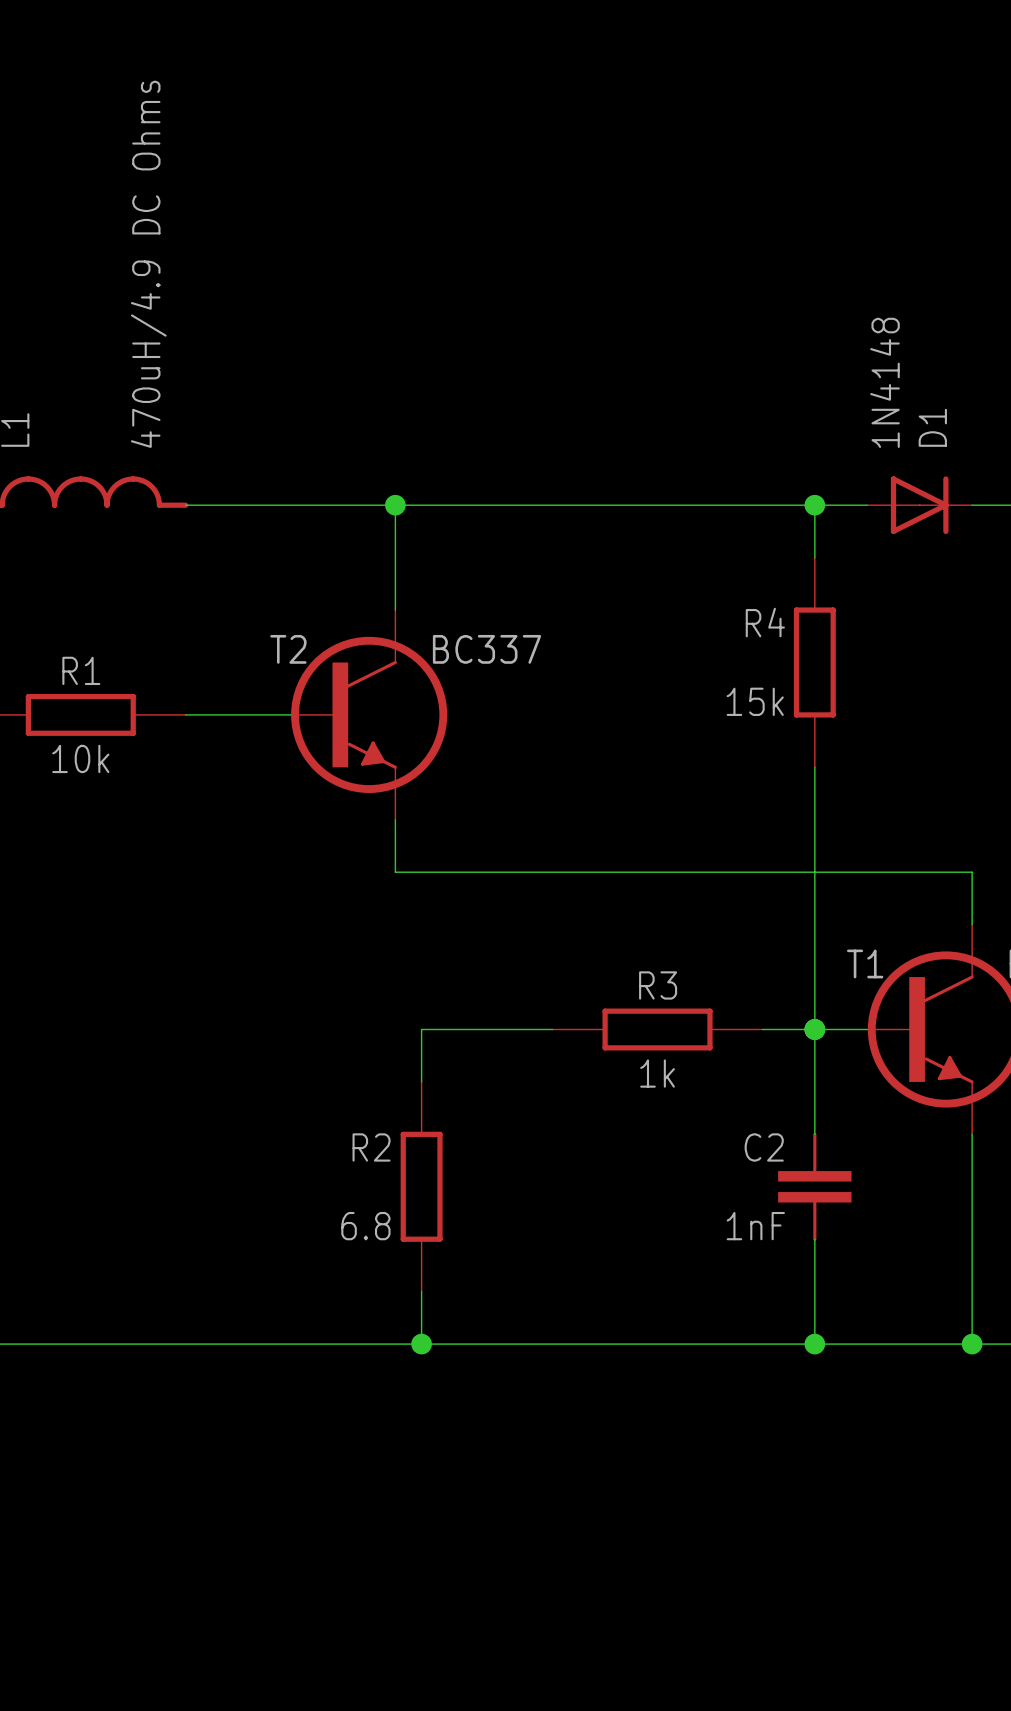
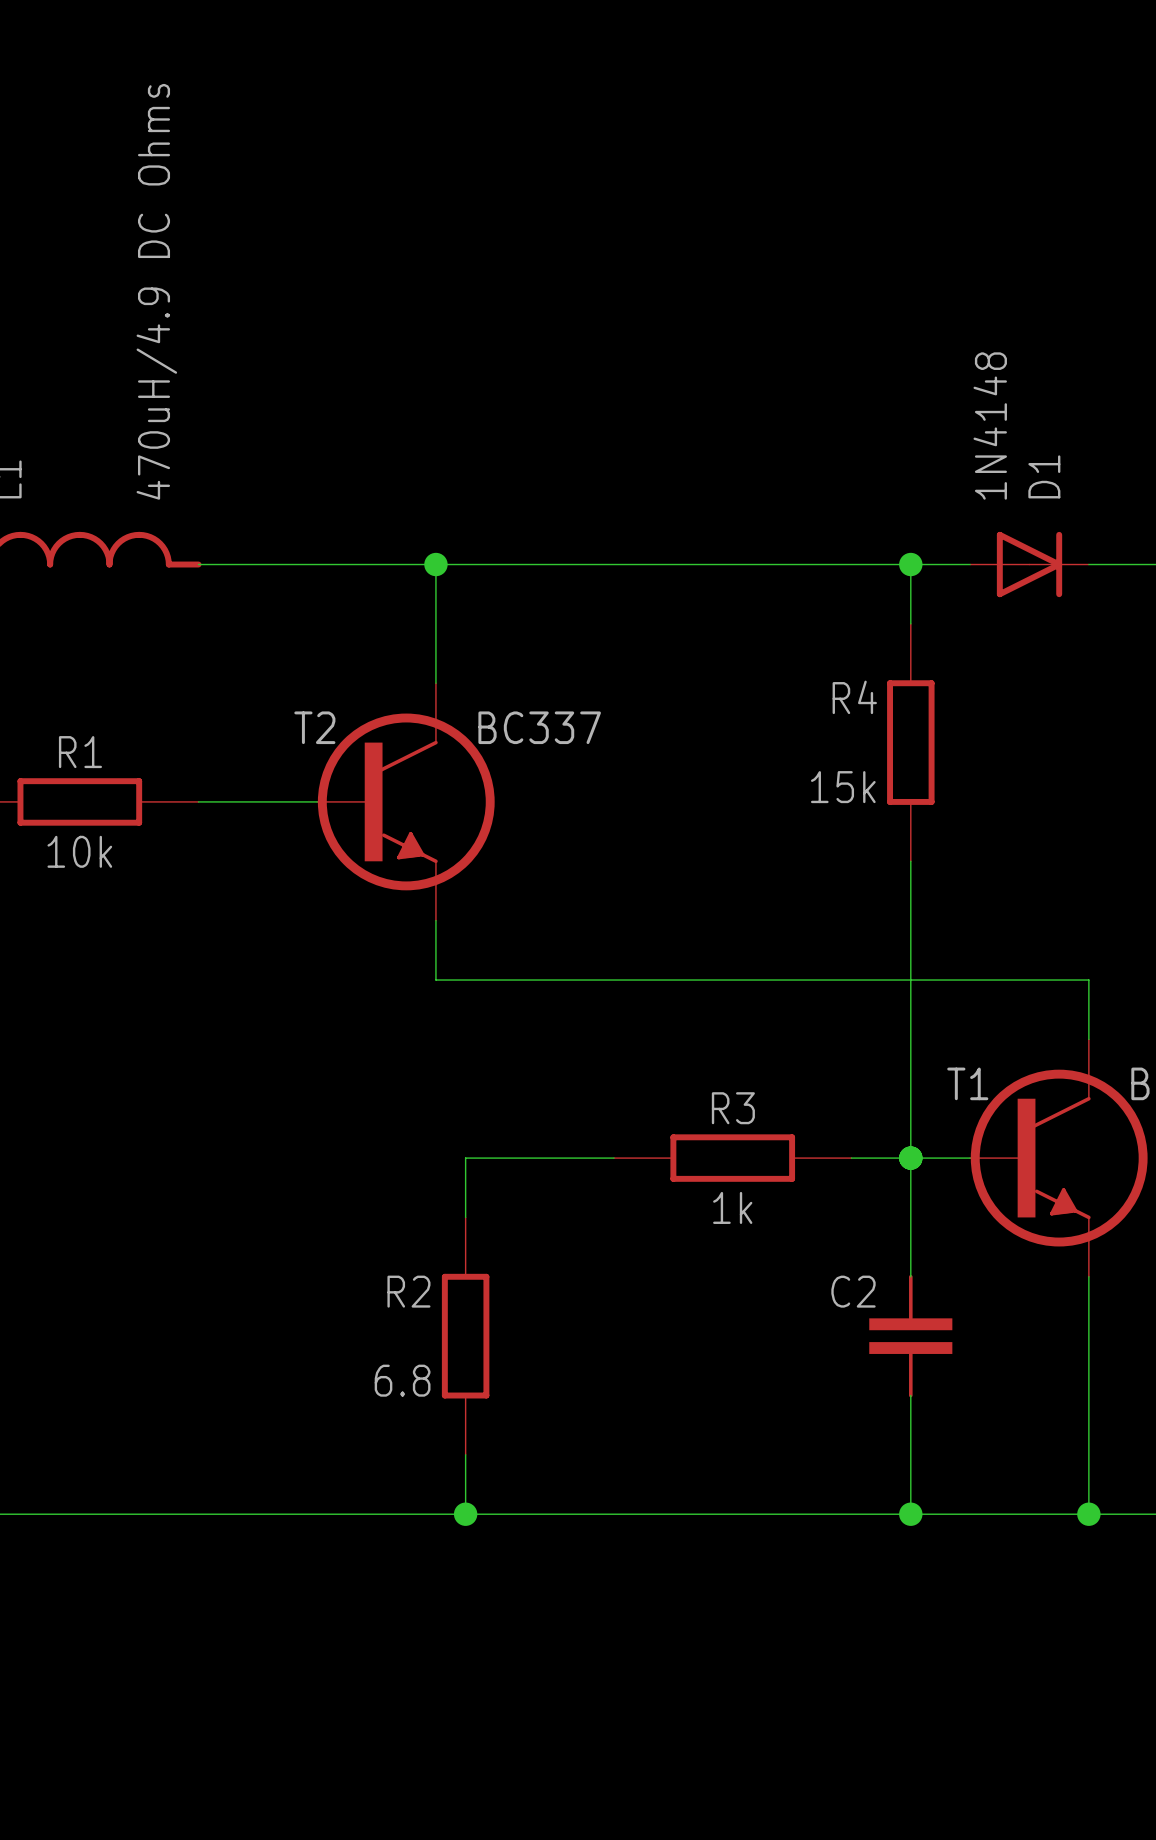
C2 value: 1nF (755, 1226) -> none

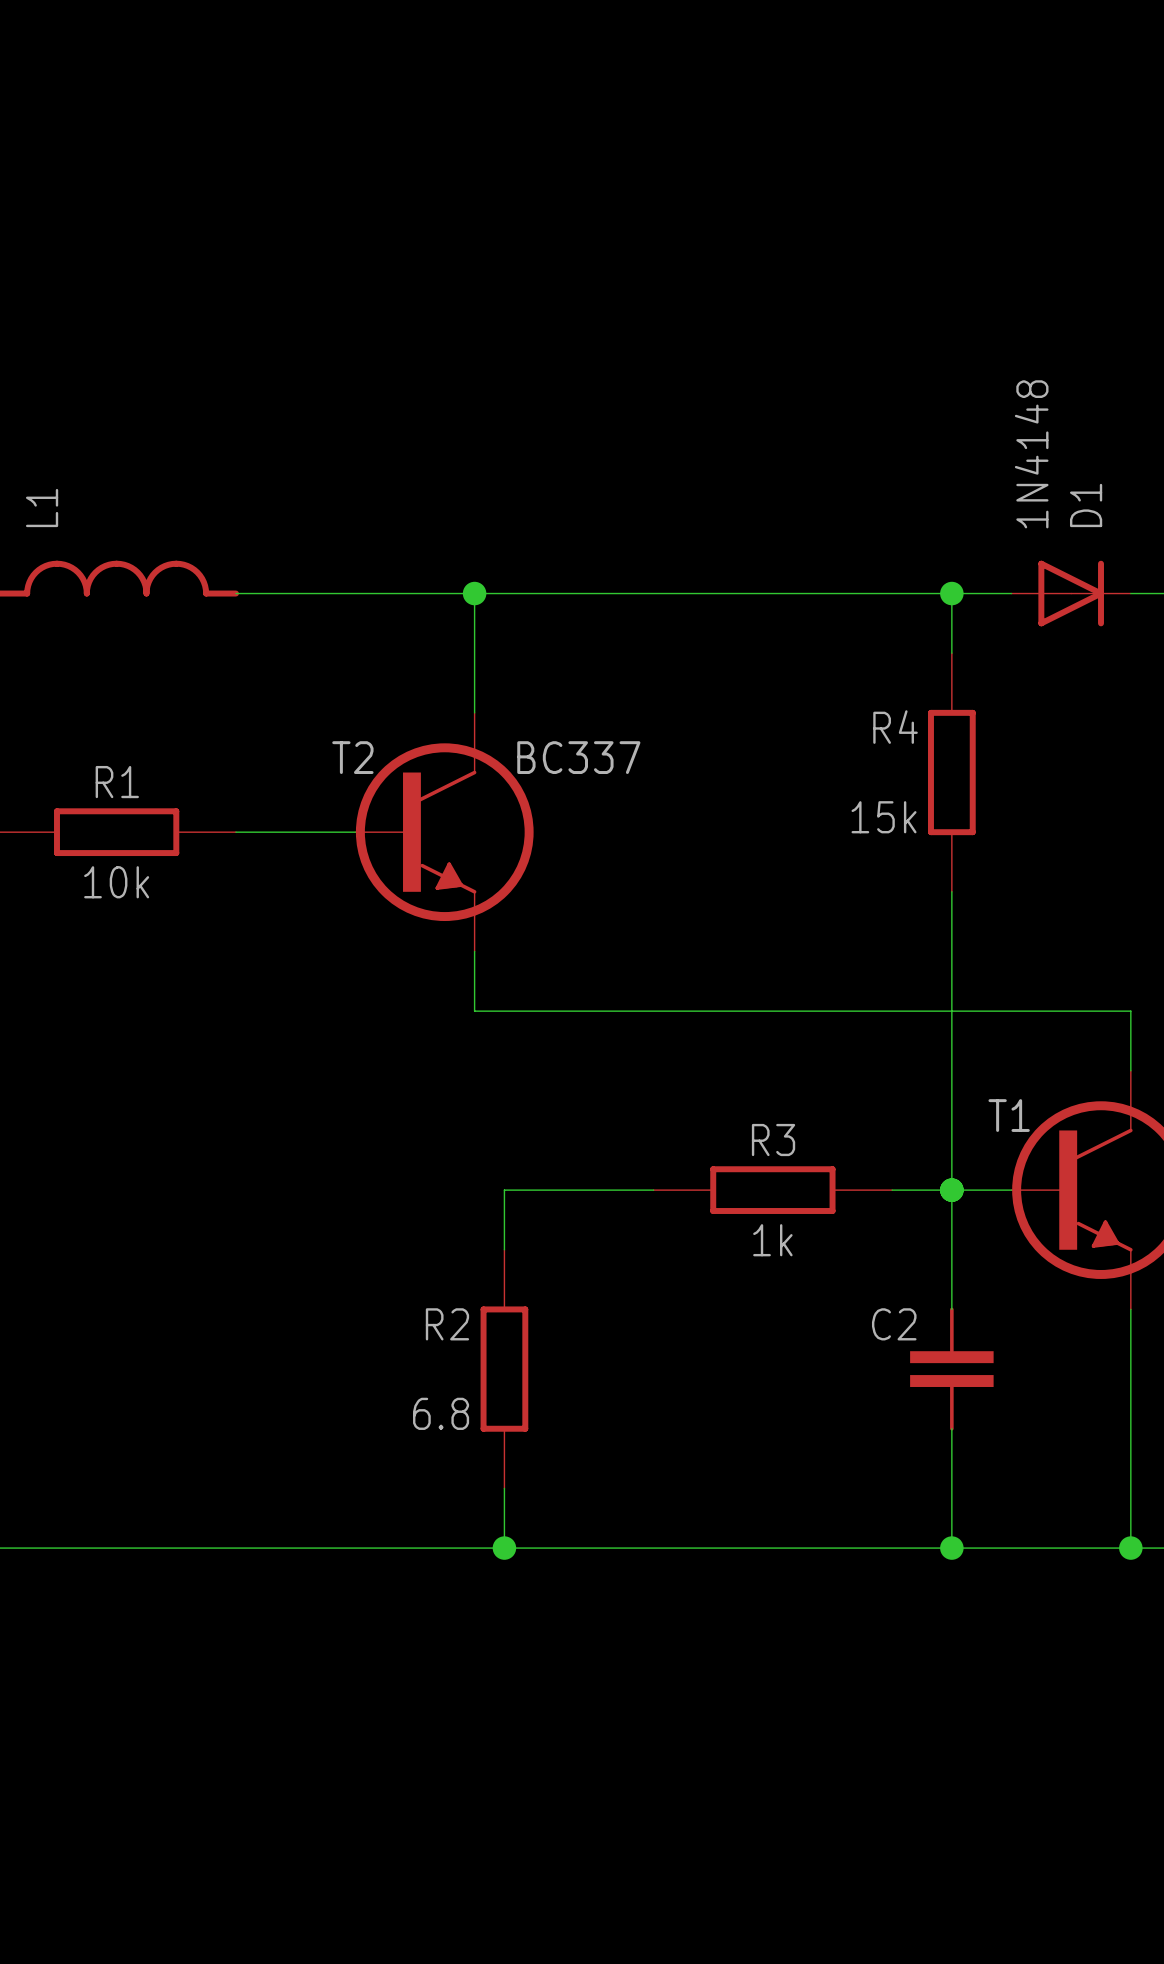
L1 value: 470uH/4.9 DC Ohms (156, 291) -> none

